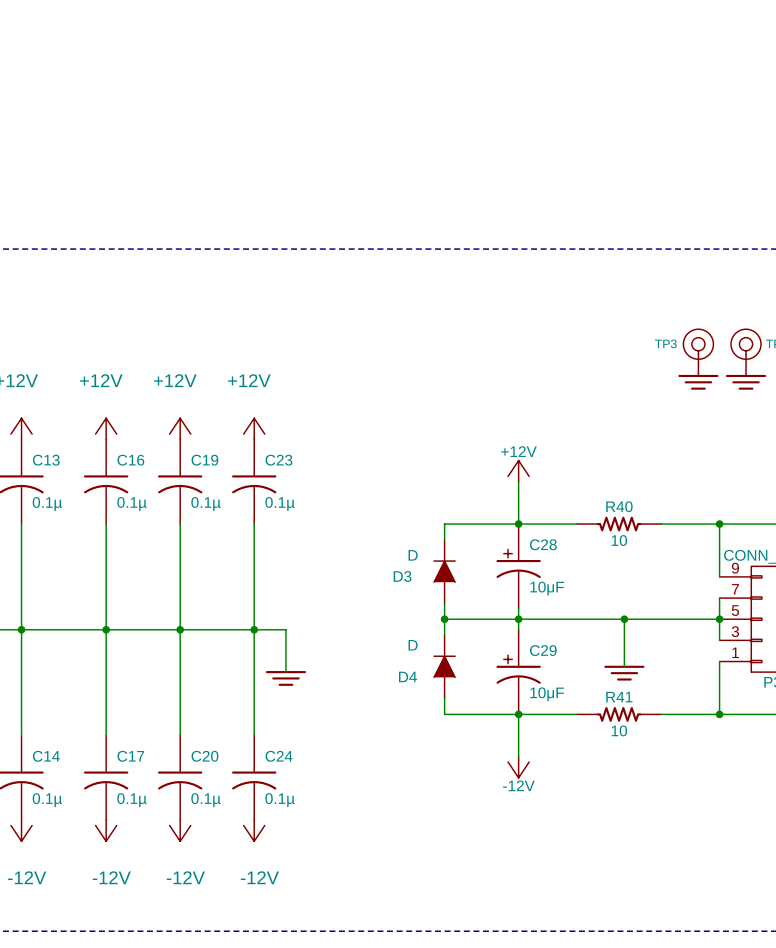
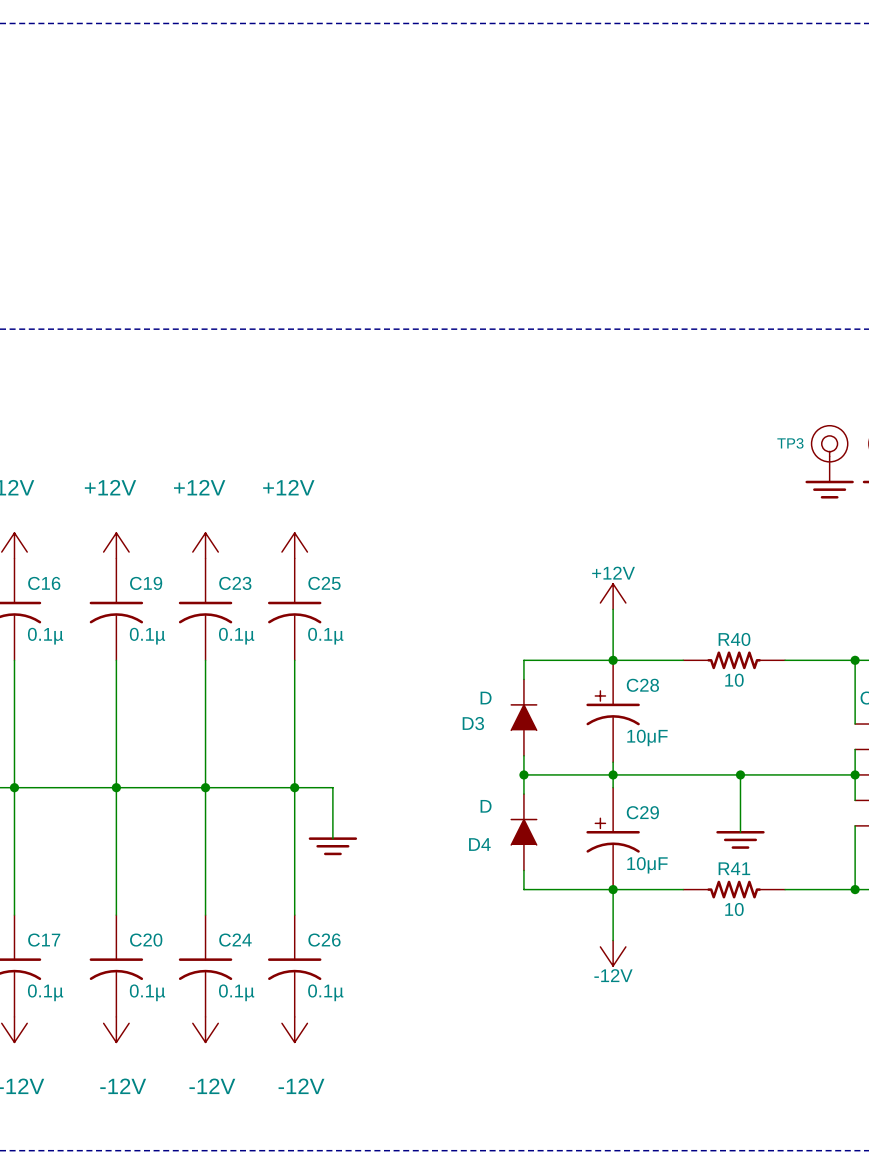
C13 name: C13 (46, 460) -> C16 (44, 583)
C16 name: C16 (130, 460) -> C19 (146, 583)
C19 name: C19 (204, 460) -> C23 (235, 583)
C23 name: C23 (278, 460) -> C25 (324, 583)
C14 name: C14 (46, 756) -> C17 (44, 940)
C17 name: C17 (130, 756) -> C20 (146, 940)
C20 name: C20 (204, 756) -> C24 (235, 940)
C24 name: C24 (279, 756) -> C26 (324, 940)

